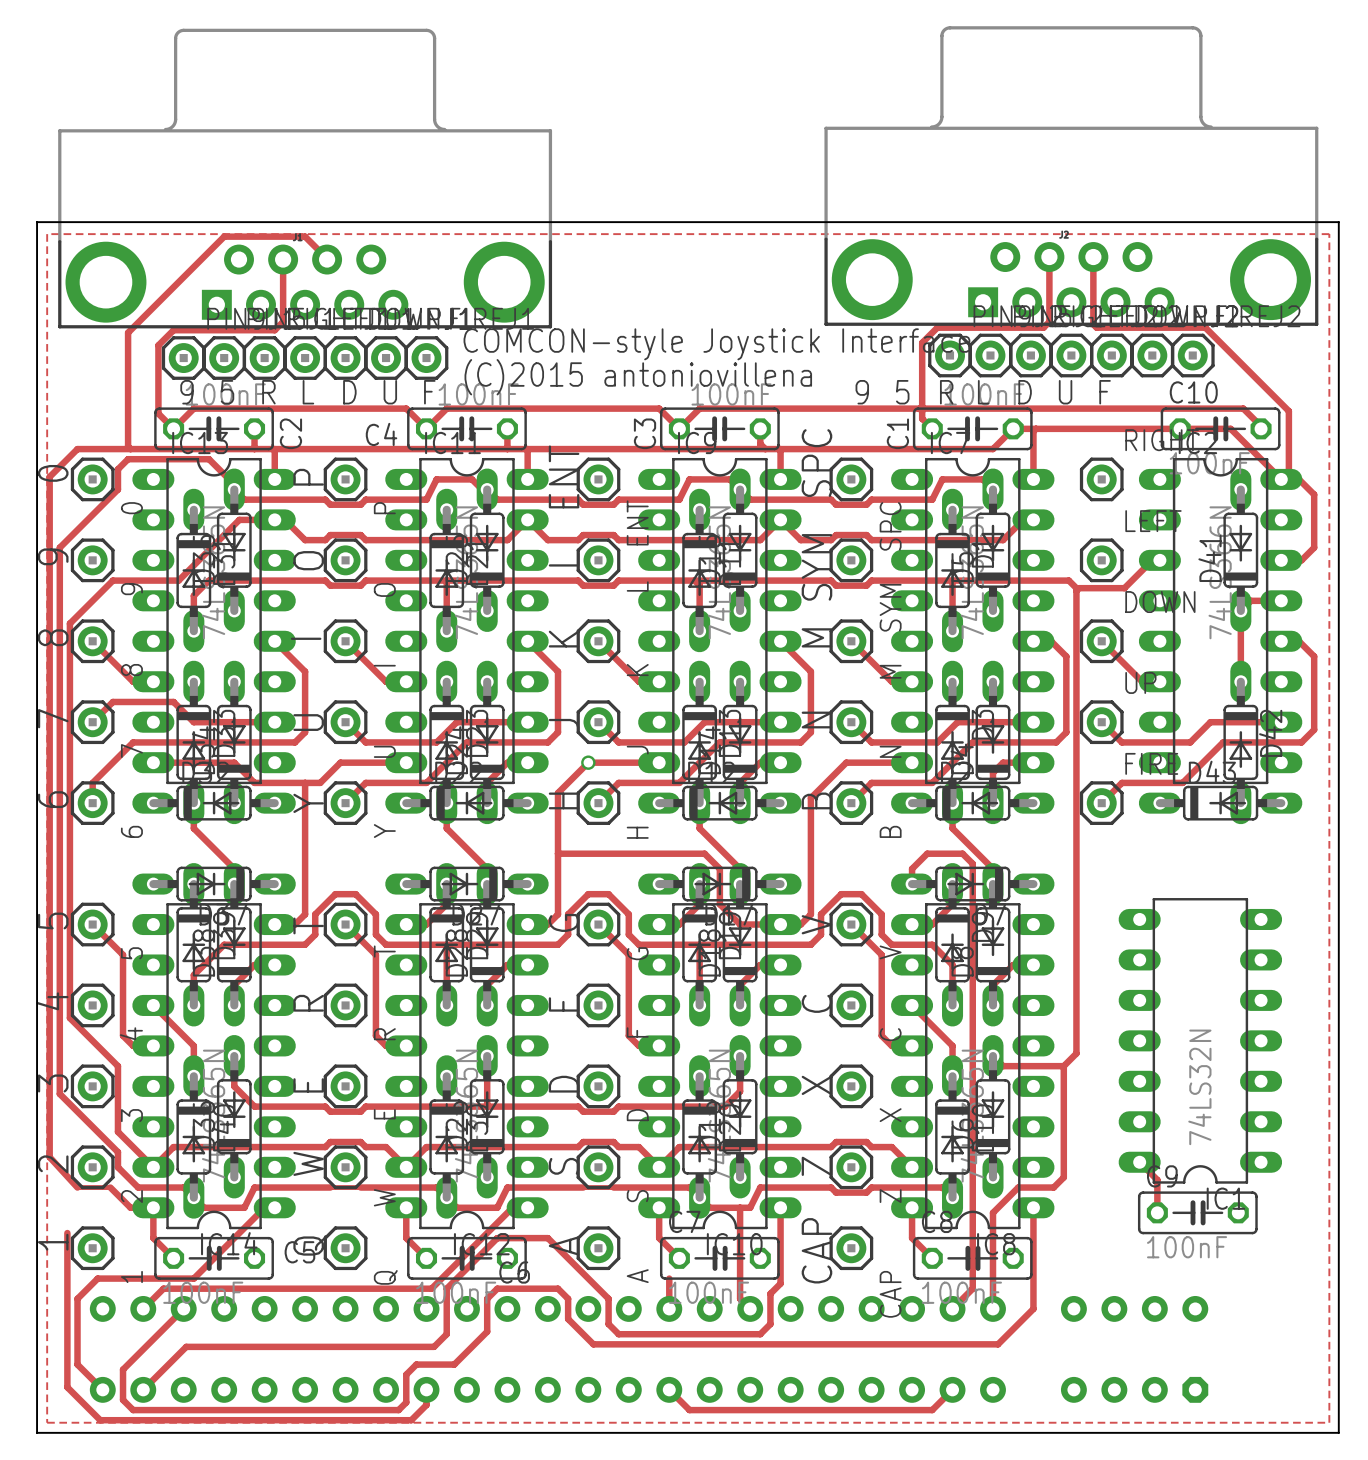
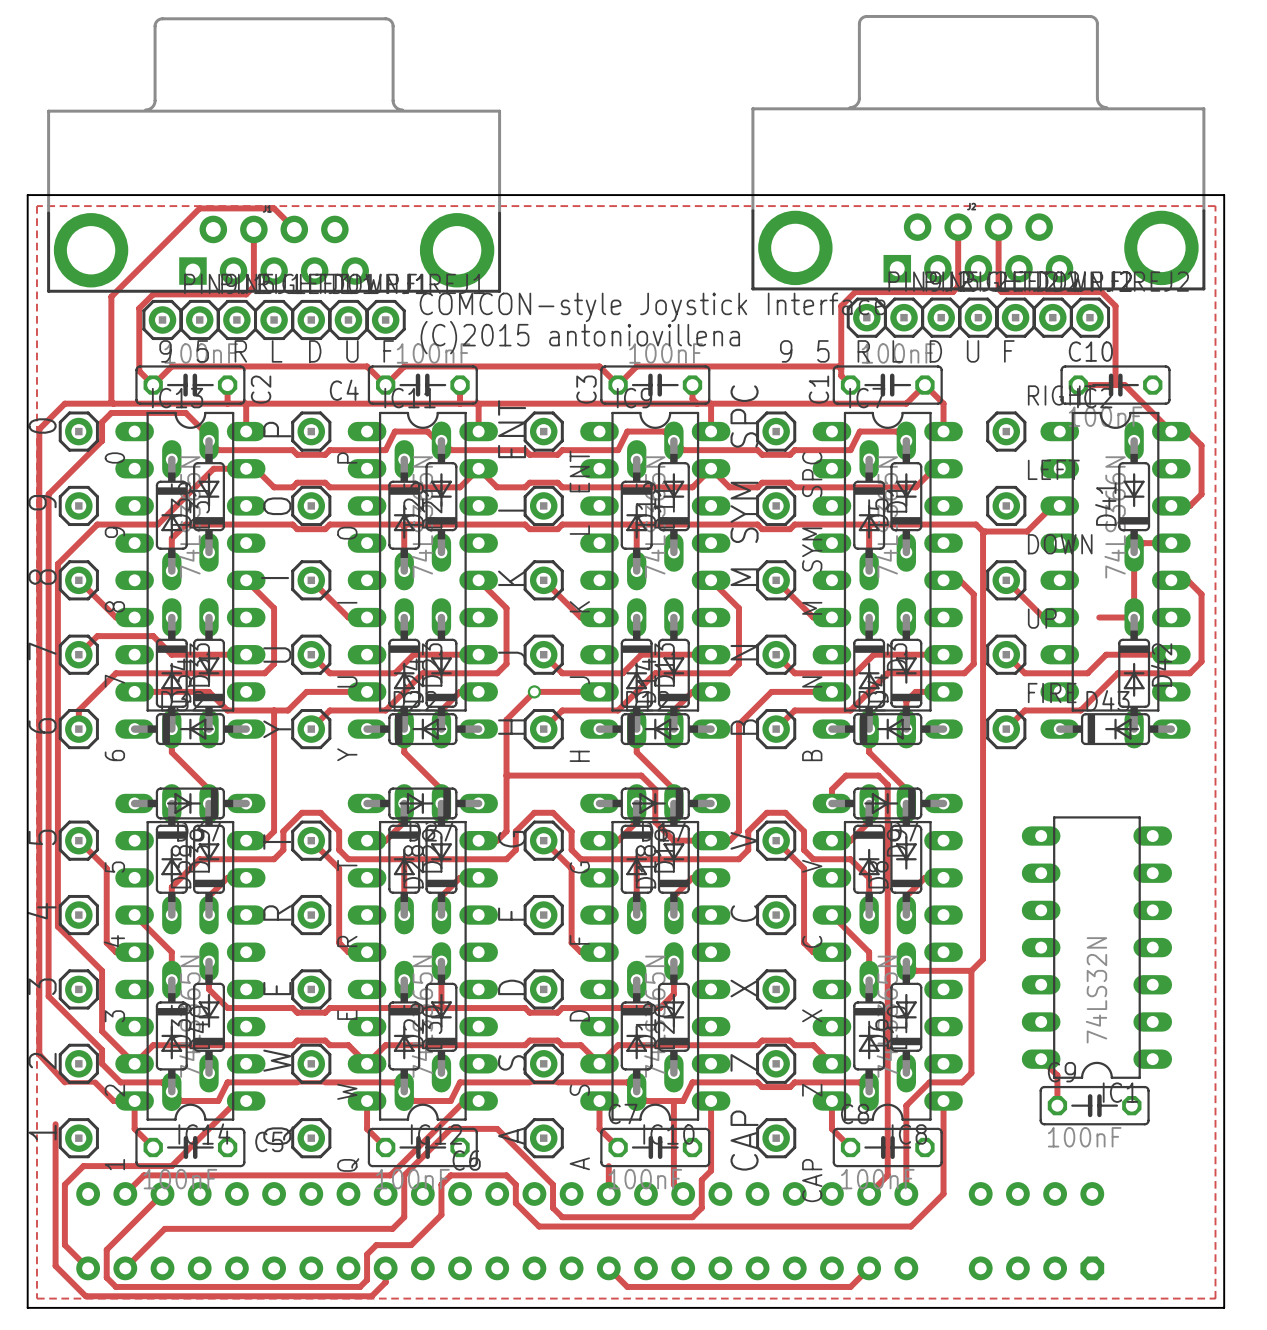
track: (1220, 342) (1288, 411) (1288, 471) (1281, 479) -> (1115, 306) (1115, 382) (1117, 385)
track: (922, 408) (1243, 408) (1261, 426) (1261, 428) -> none
track: (1013, 428) (1180, 428) -> none
track: (1035, 428) (1033, 431) (1033, 449) -> (924, 385) (943, 403)
track: none -> (1099, 617) (1134, 617)

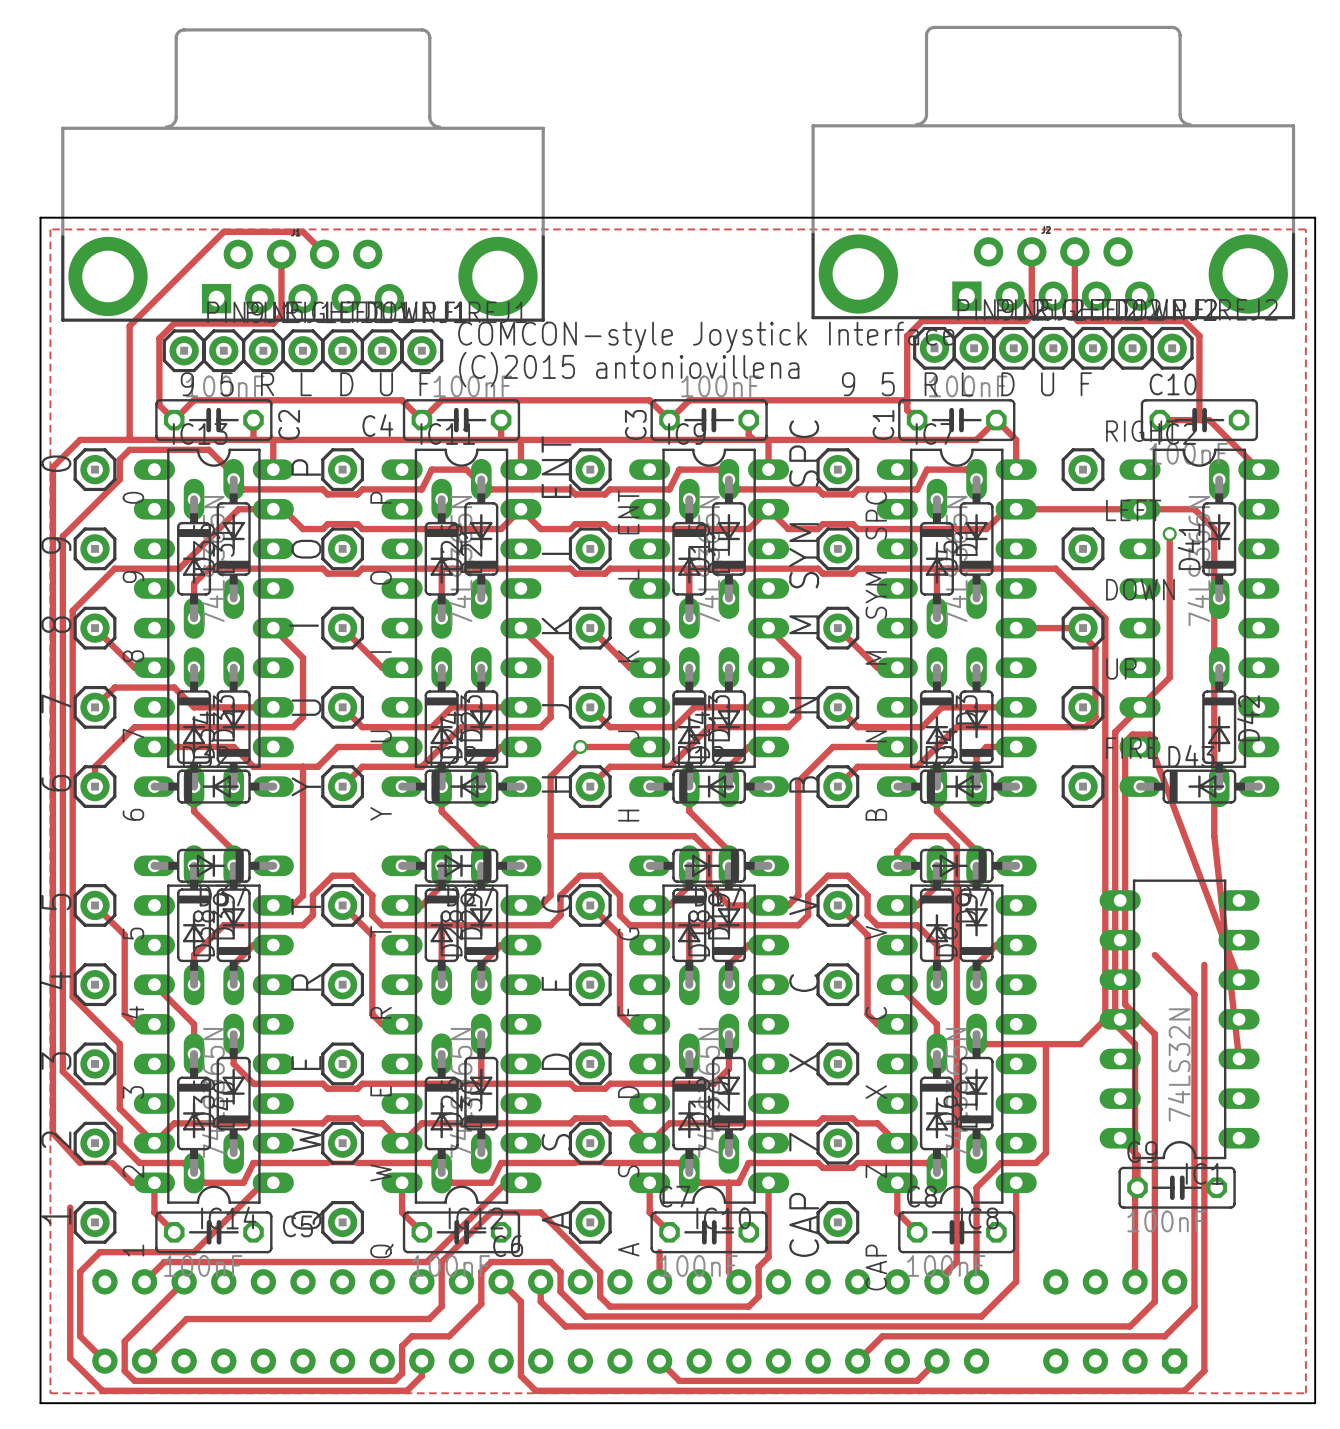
track: (1171, 431) (1187, 431) (1201, 445) (1201, 494) (1189, 505) (1171, 505) -> none
track: none -> (1016, 509) (1194, 509) (1214, 529) (1214, 836) (1239, 1058)
track: none -> (1169, 534) (1169, 677) (1115, 732) (1115, 1024) (1135, 1044) (1135, 1281)
via: none -> (1169, 534)
track: (1059, 505) (1052, 505) (1027, 531) (985, 531) (983, 533) -> none
track: (976, 524) (983, 531) (983, 959) (971, 970) -> (1050, 568) (1055, 568) (1105, 618) (1105, 1019) (1080, 1044) (1045, 1044)
track: (1171, 543) (1143, 543) (1134, 552) (1134, 617) (1099, 617) -> none
track: (959, 580) (973, 594) (973, 664) (964, 673) -> (1033, 628) (1075, 628) (1095, 647) (1095, 717) (1085, 727) (1038, 727)
track: (1006, 580) (1043, 617) (1059, 617) -> none
track: (1171, 580) (1187, 580) (1201, 594) (1201, 661) (1189, 673) (1117, 673) (1080, 710) (1024, 710) (1006, 729) -> none
track: (1006, 654) (1024, 673) (1087, 673) (1106, 654) (1171, 654) -> none
track: none -> (1154, 954) (1194, 994) (1194, 1306) (1164, 1336) (882, 1336) (857, 1361)
track: none -> (1204, 964) (1204, 1370) (1184, 1390) (535, 1390) (520, 1375) (520, 1301) (501, 1281)
track: none -> (1239, 979) (1154, 756) (1154, 739) (1149, 734) (1132, 734) (1125, 742) (1125, 1004) (1154, 1034) (1154, 1301) (1130, 1326) (565, 1326) (540, 1301) (540, 1281)

